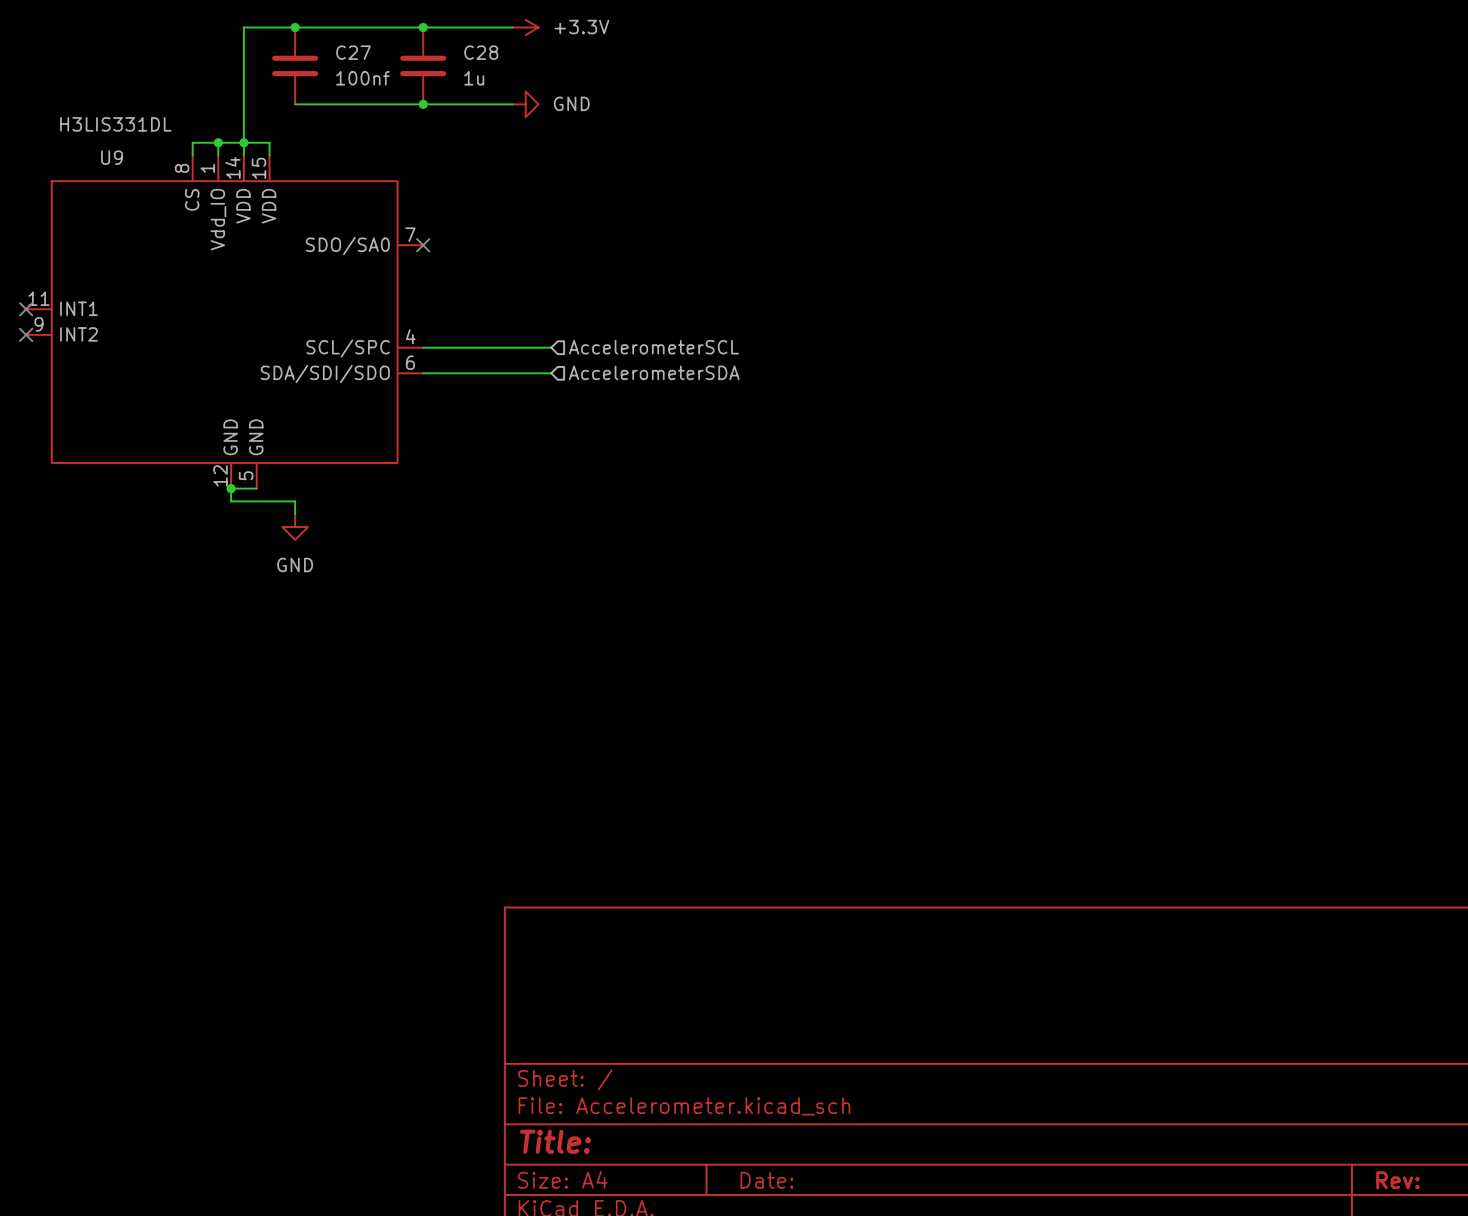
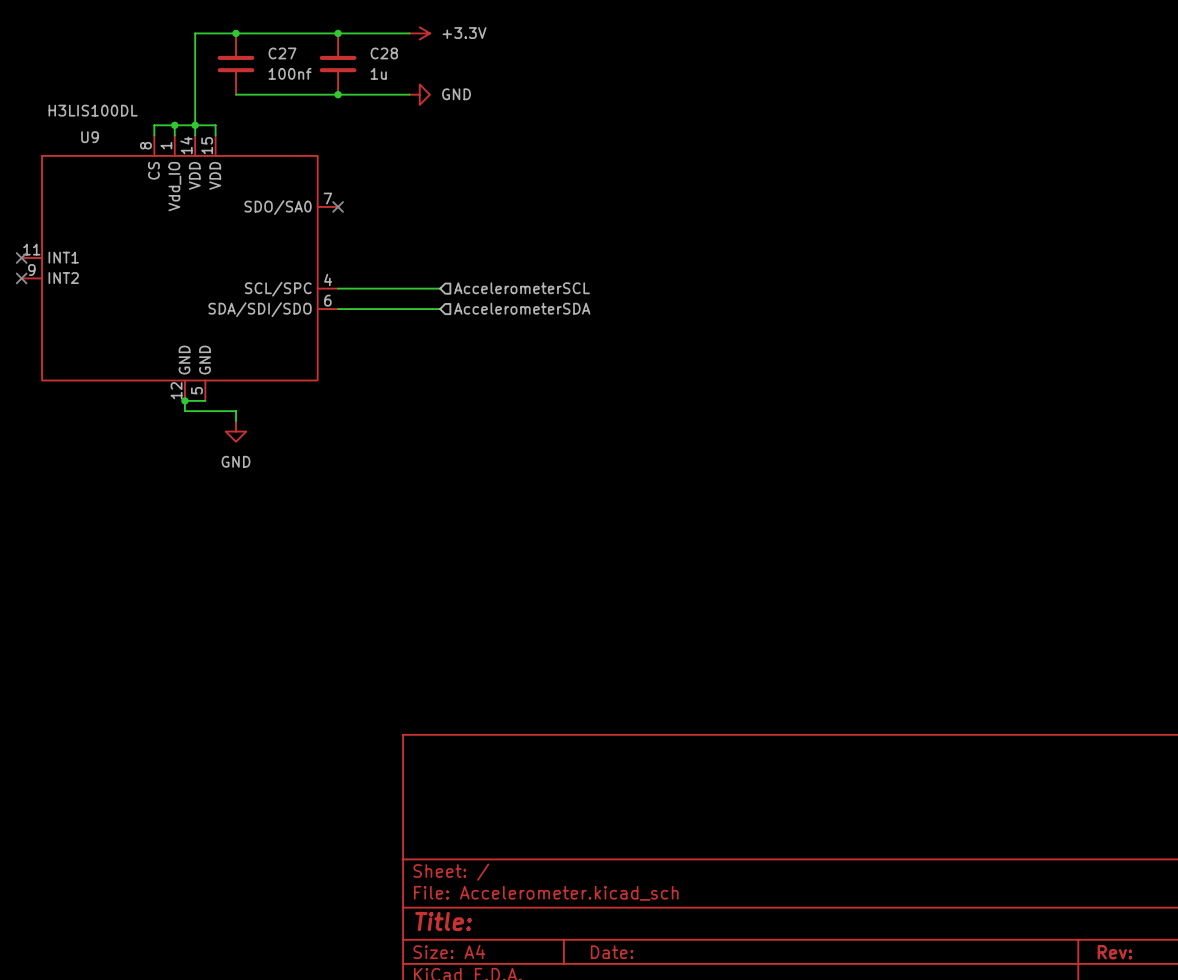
U9 value: H3LIS331DL (115, 124) -> H3LIS100DL (93, 110)

